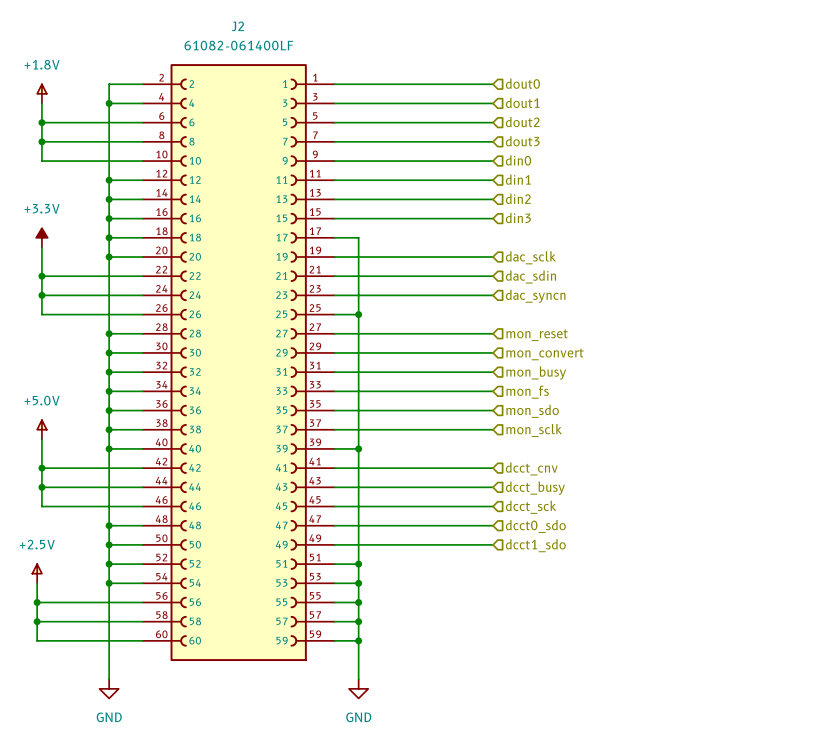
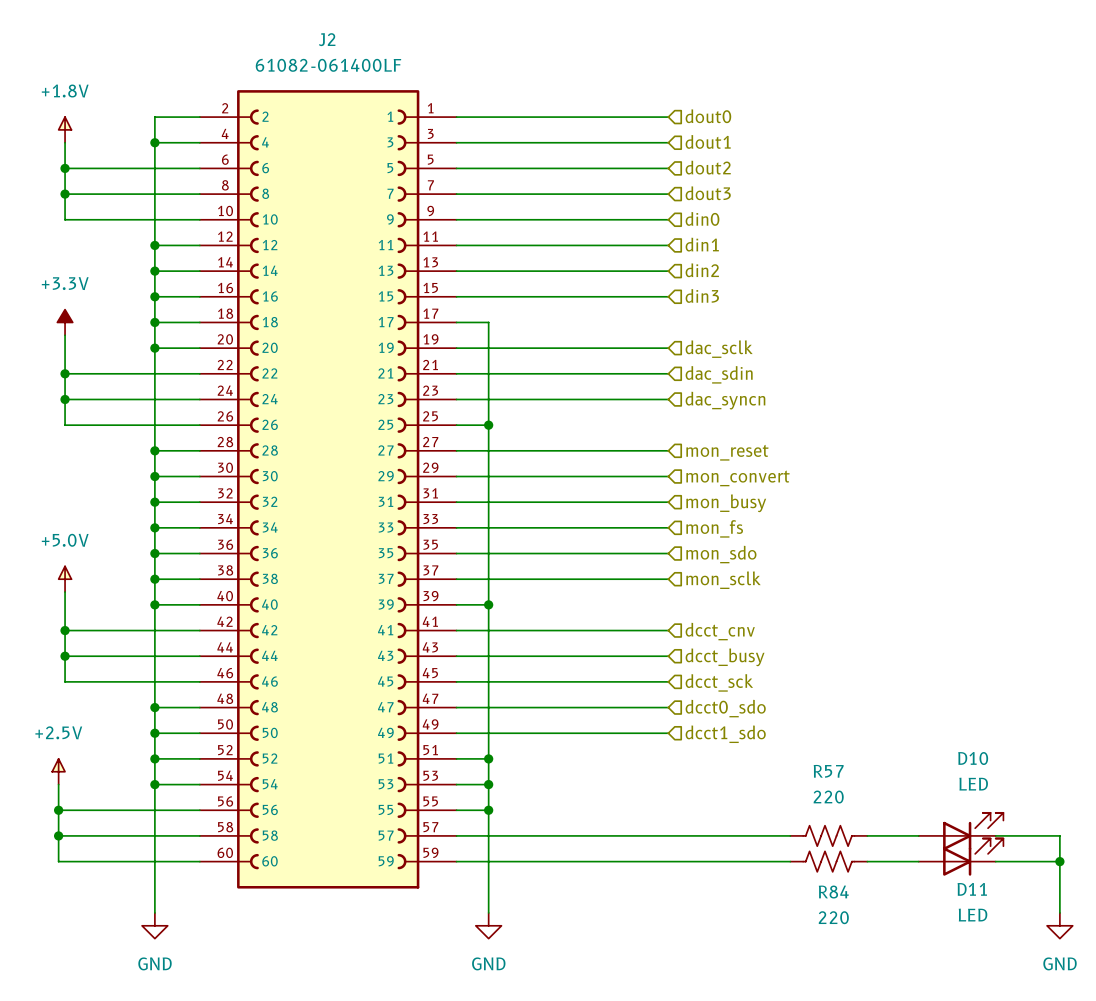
D10: none -> LED (961, 831)
wire: none -> (488, 835) (790, 835)
junction: (358, 621) -> none
R57: none -> 220 (828, 835)
wire: none -> (867, 835) (918, 835)
wire: none -> (995, 835) (1059, 835) (1059, 912)
D11: none -> LED (961, 857)
wire: none -> (488, 861) (790, 861)
junction: (358, 640) -> none
R84: none -> 220 (828, 861)
wire: none -> (867, 861) (918, 861)
wire: none -> (995, 861) (1059, 861)
junction: none -> (1059, 861)
power symbol: none -> GND (1059, 925)

